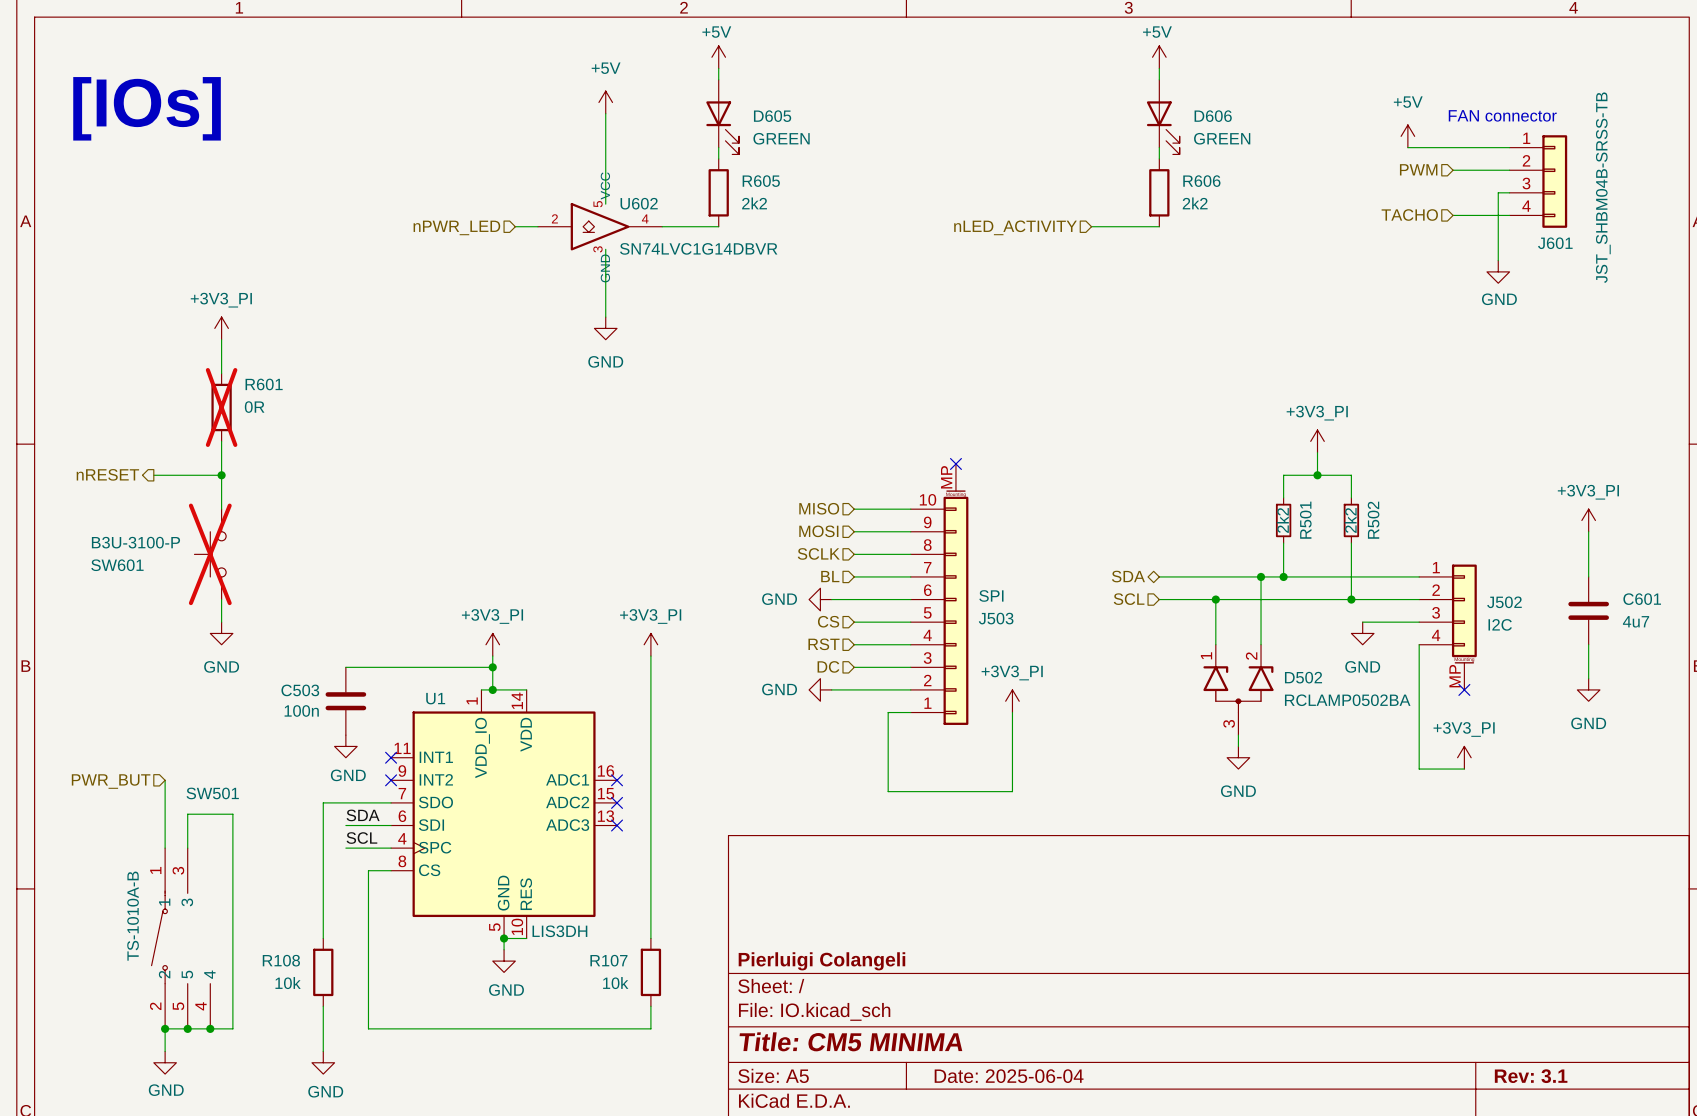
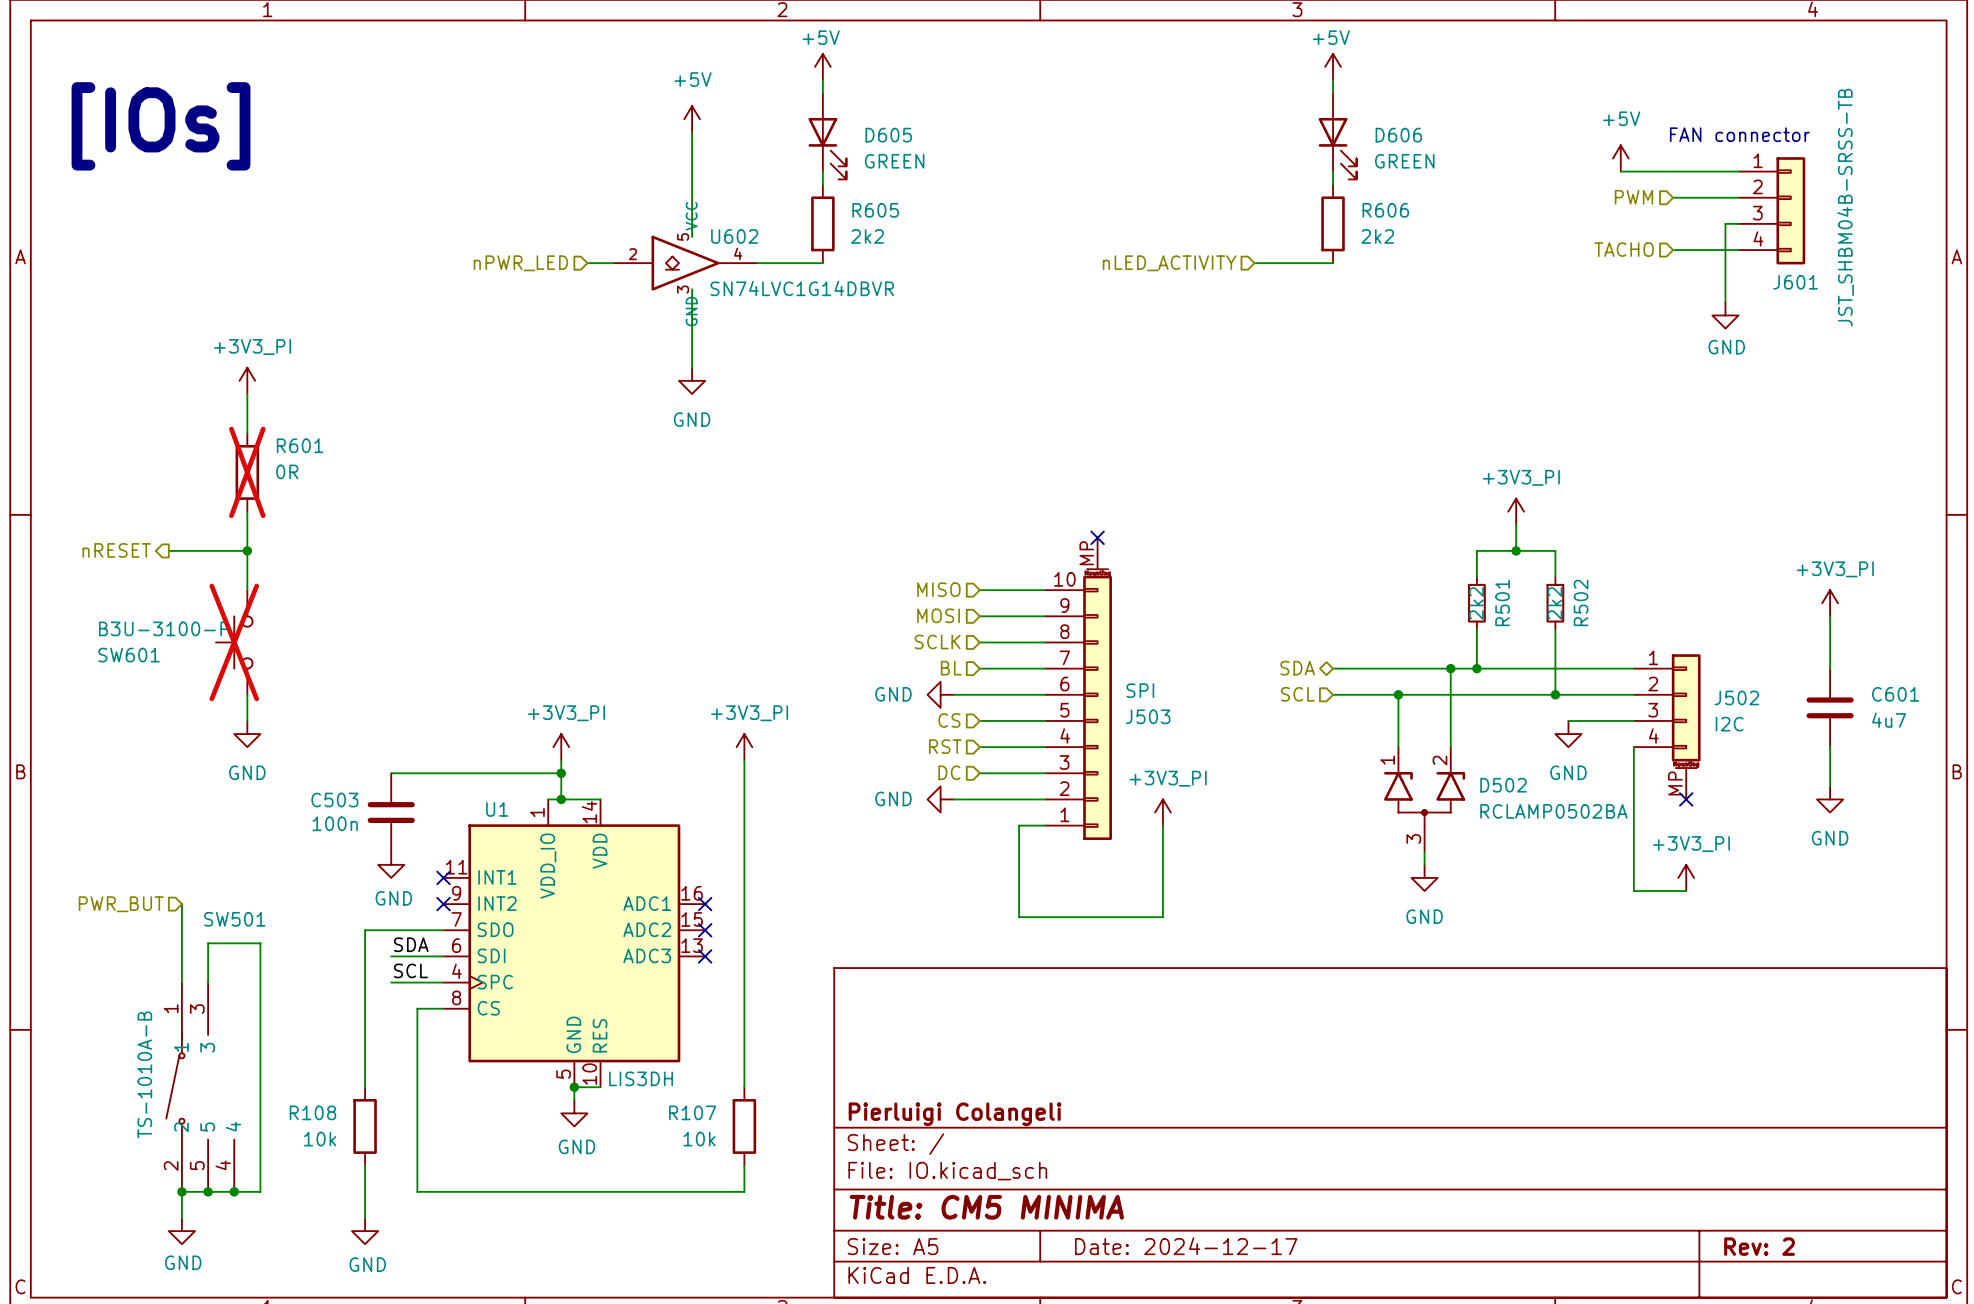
title block: Date: 2025-06-04 (1009, 1076) -> Date: 2024-12-17 (1186, 1246)
title block: Rev: 3.1 (1531, 1076) -> Rev: 2 (1759, 1246)

